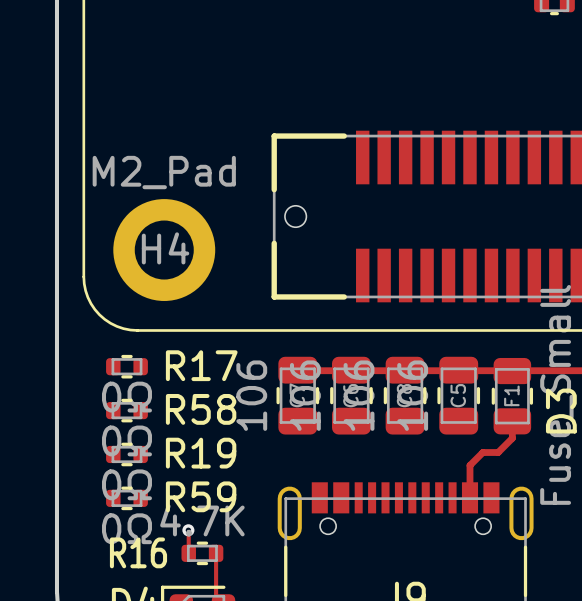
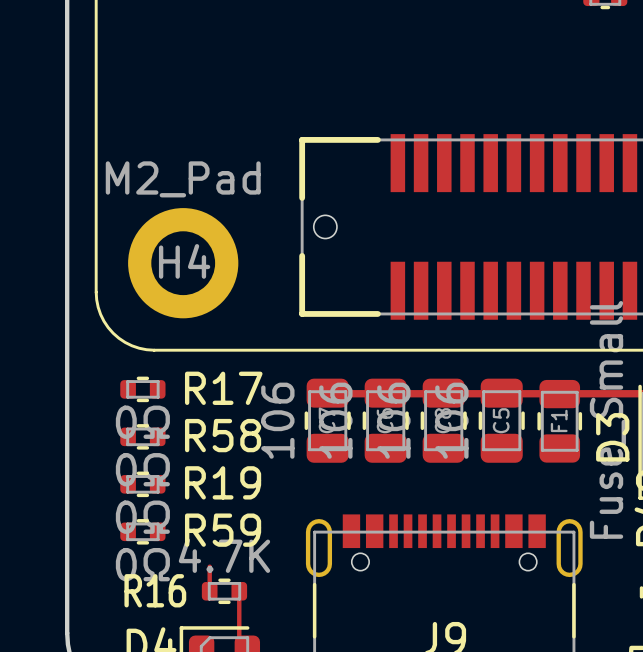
top track: (512, 421) (512, 438) (498, 452) (482, 452) (469, 465) (469, 487) -> none
via: (188, 530) -> none

